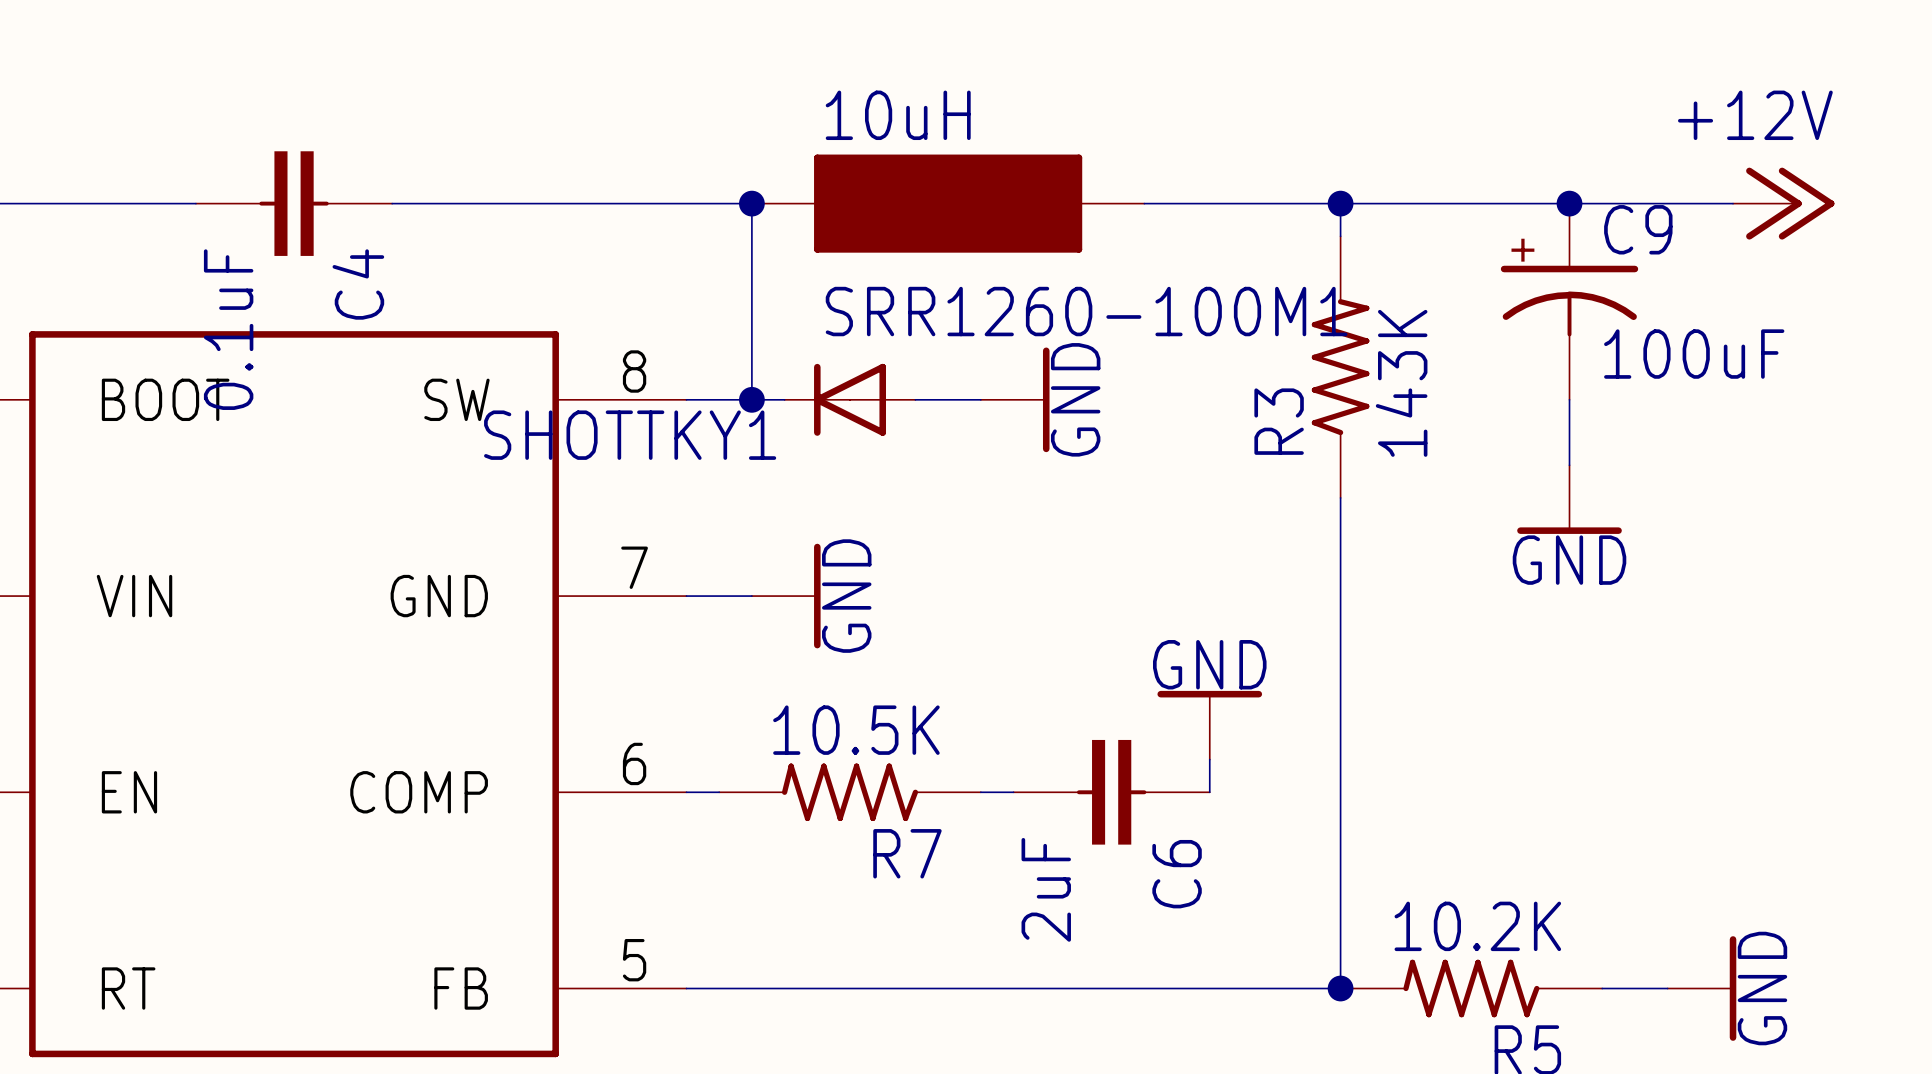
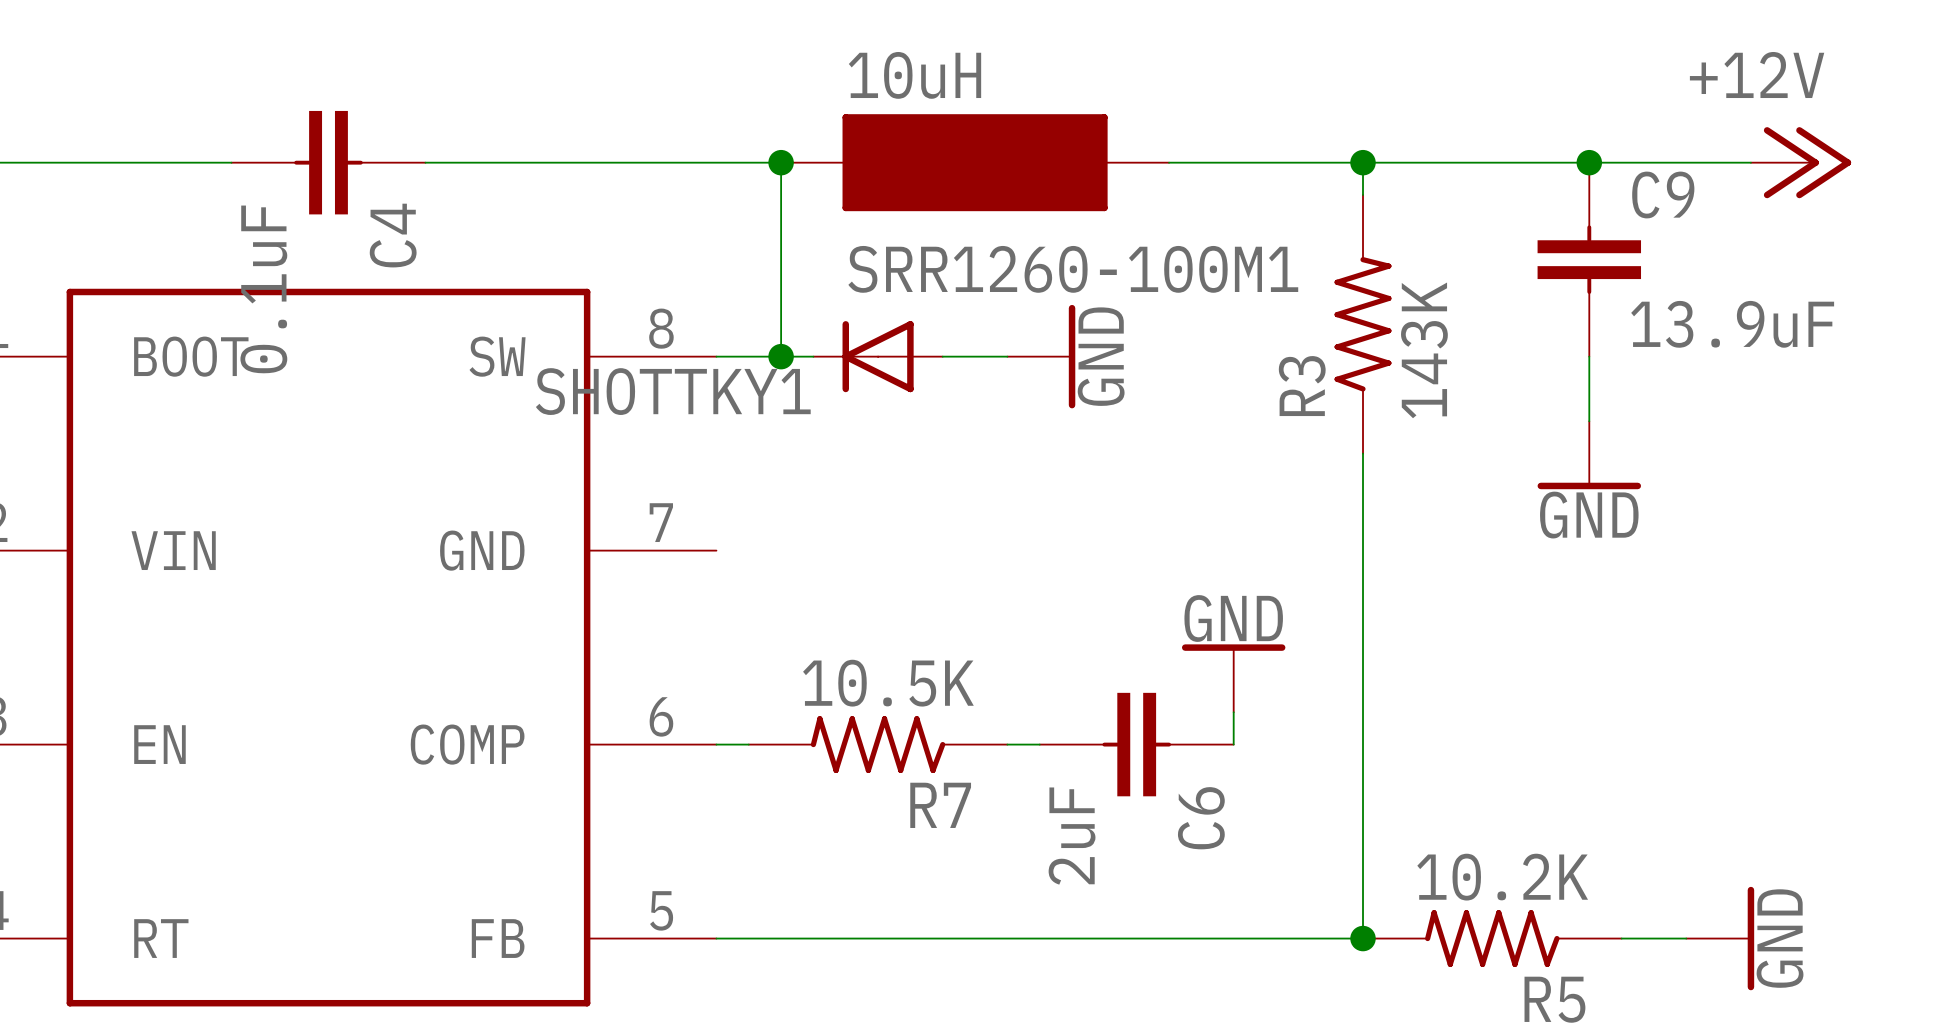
C9 symbol: [1500, 203, 1639, 400] -> [1537, 162, 1642, 357]
C9 value: 100uF (1694, 354) -> 13.9uF (1732, 324)
wire: (686, 596) (751, 596) -> none
power symbol: GND (786, 596) -> none

